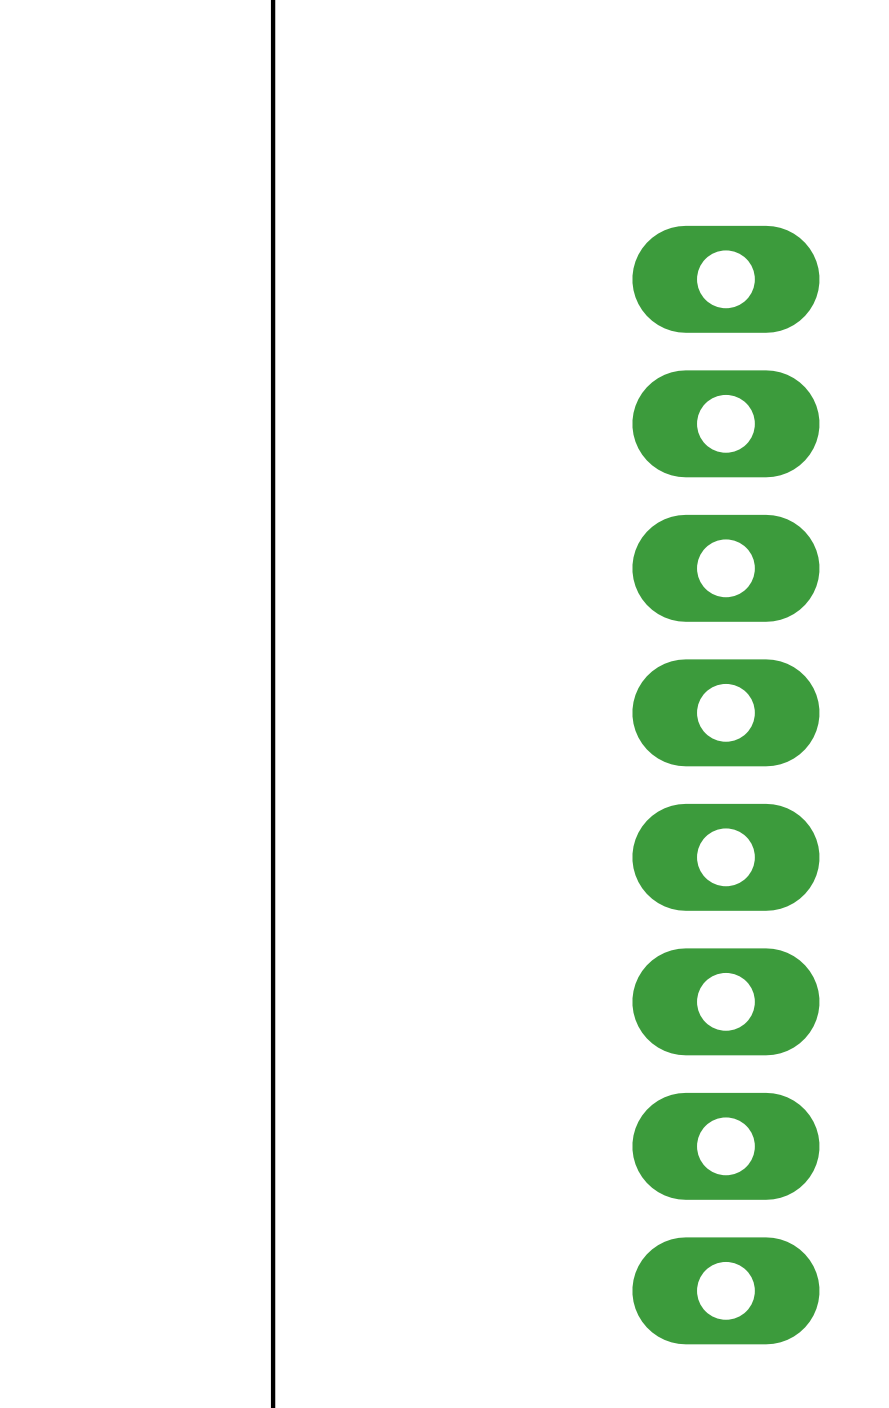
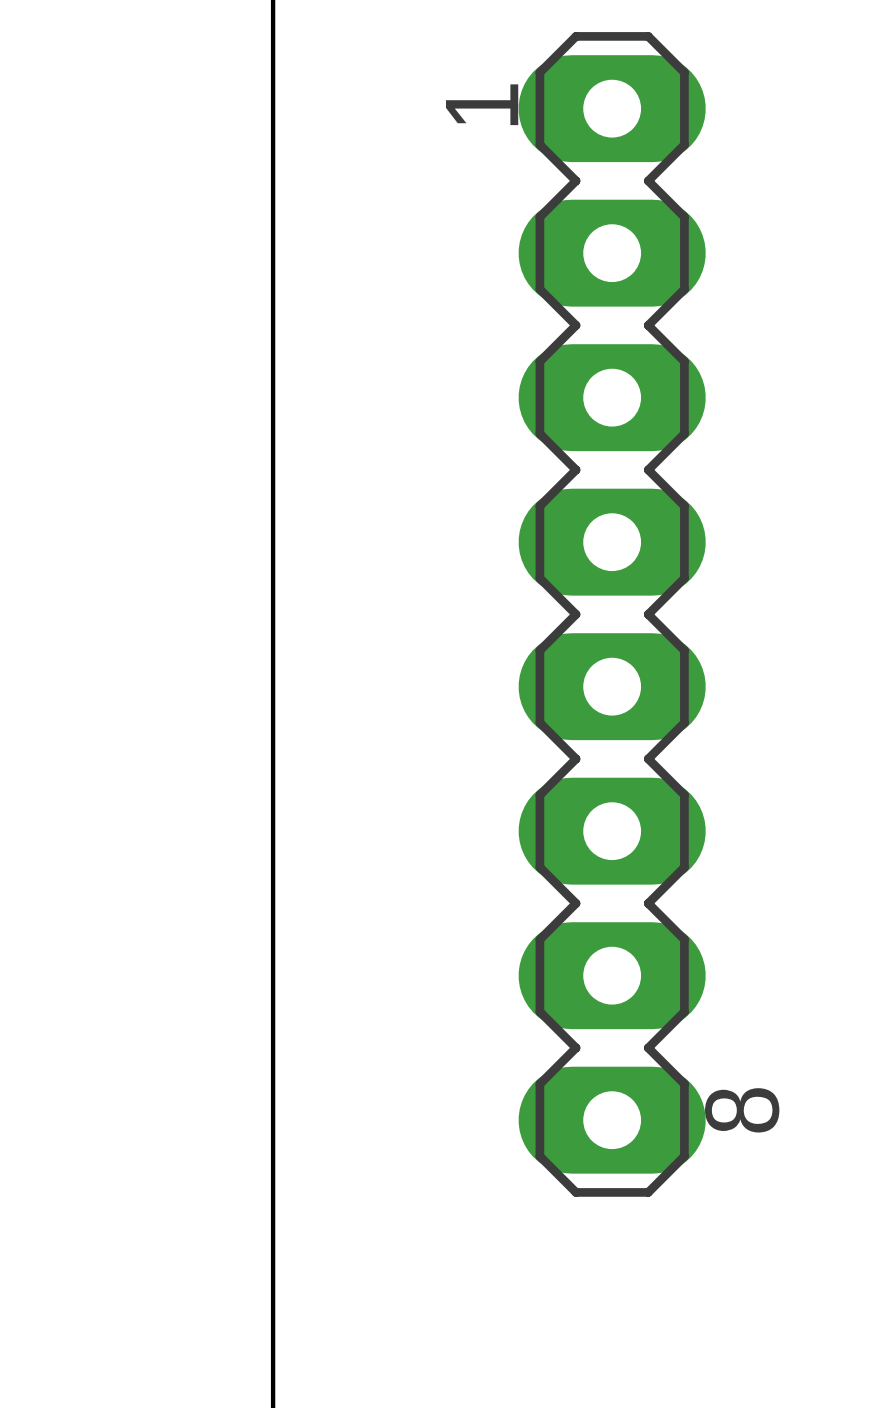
part side: top (725, 785) -> bottom (612, 614)

